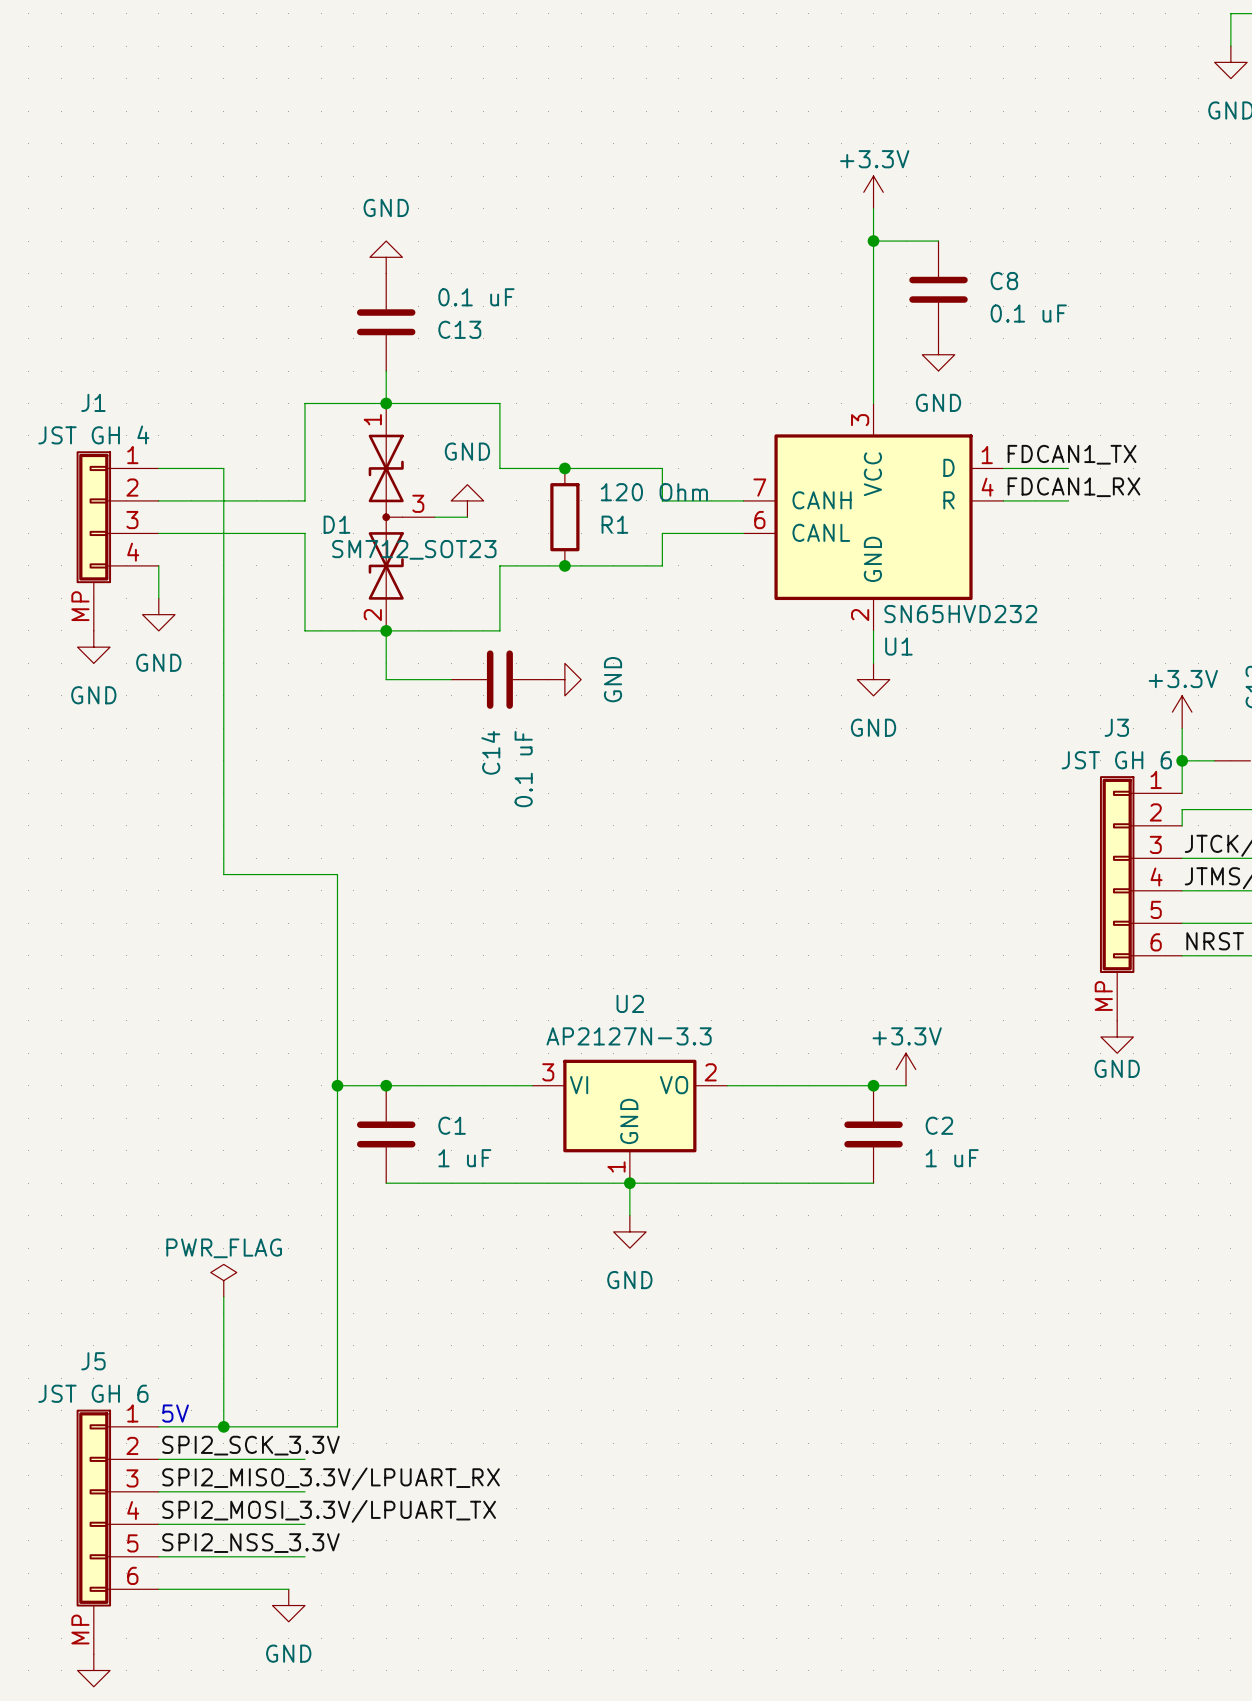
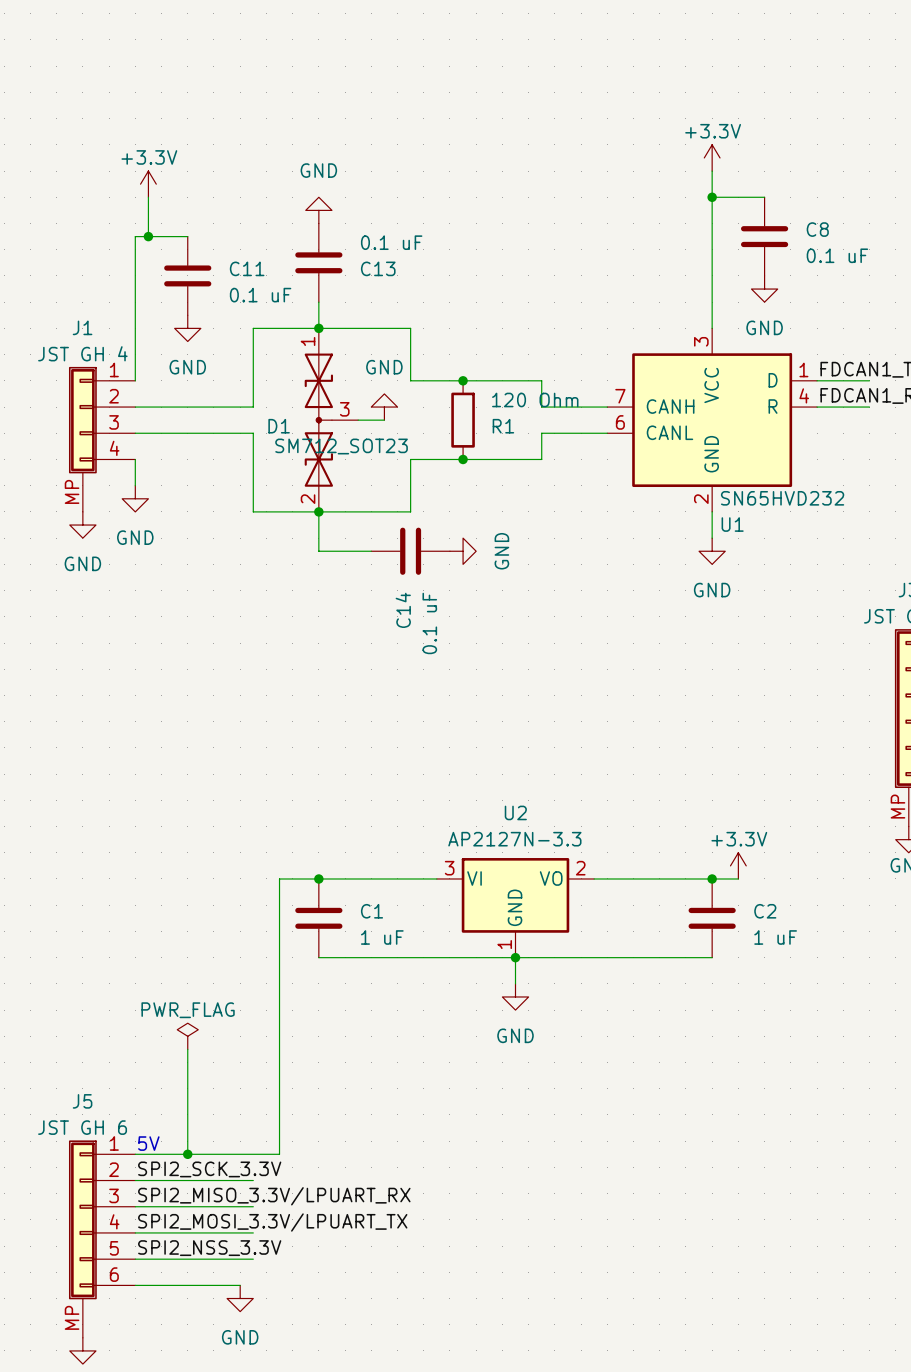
power symbol: none -> +3.3V (148, 184)
wire: none -> (148, 197) (148, 236)
junction: none -> (148, 236)
C11: none -> 0.1 uF (187, 275)
power symbol: none -> GND (187, 328)
wire: (158, 468) (223, 468) (223, 874) (337, 874) (337, 1085) -> (135, 380) (135, 236) (187, 236)
junction: (337, 1085) -> none

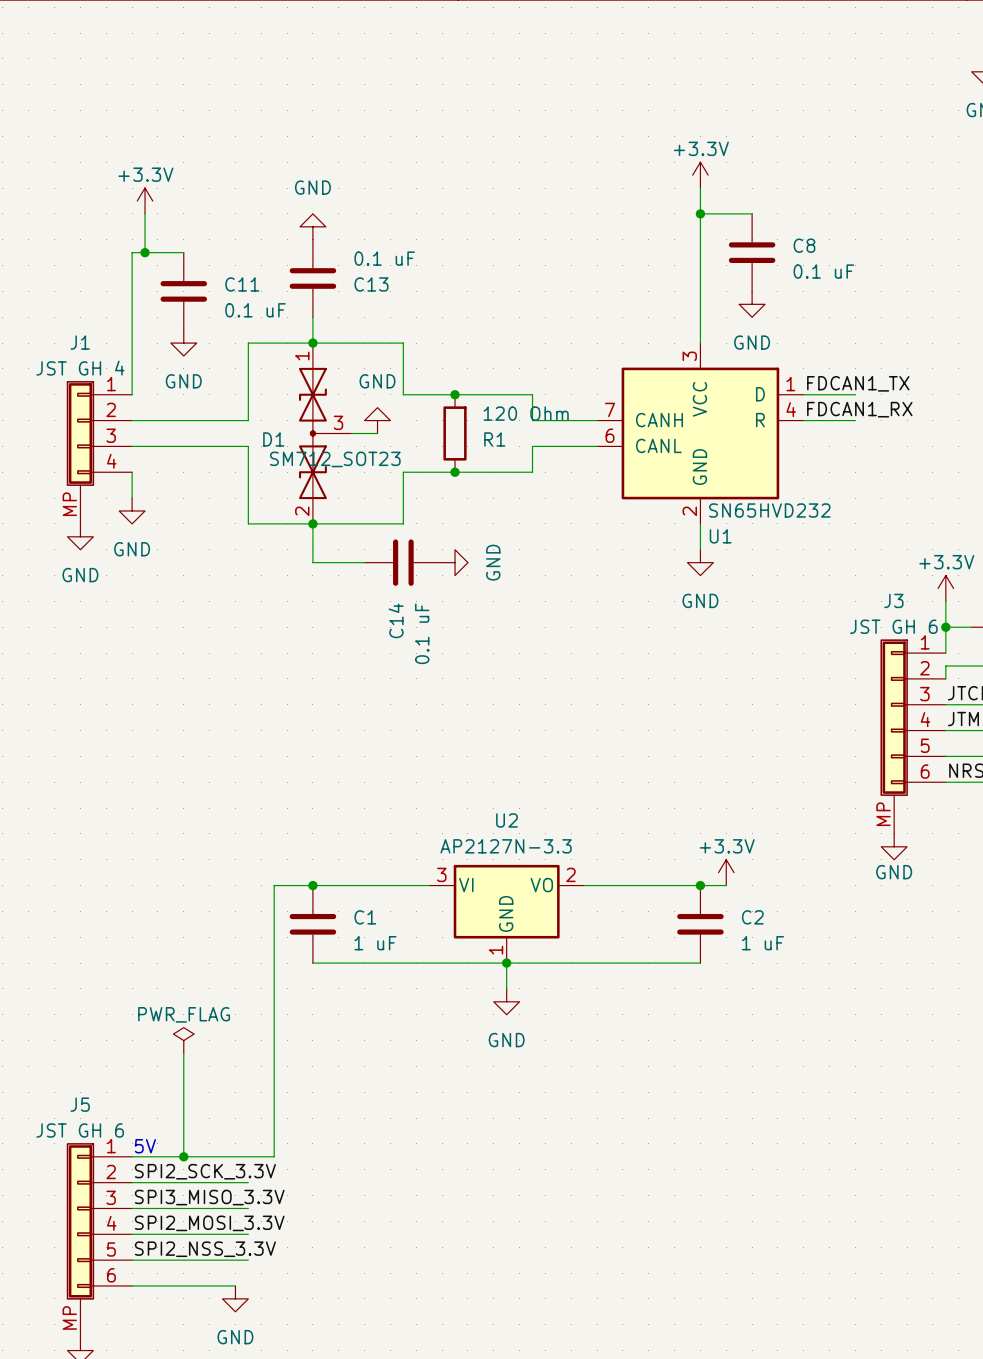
label: SPI2_MISO_3.3V/LPUART_RX (274, 1196) -> SPI3_MISO_3.3V (209, 1197)
label: SPI2_MOSI_3.3V/LPUART_TX (272, 1222) -> SPI2_MOSI_3.3V (209, 1223)

